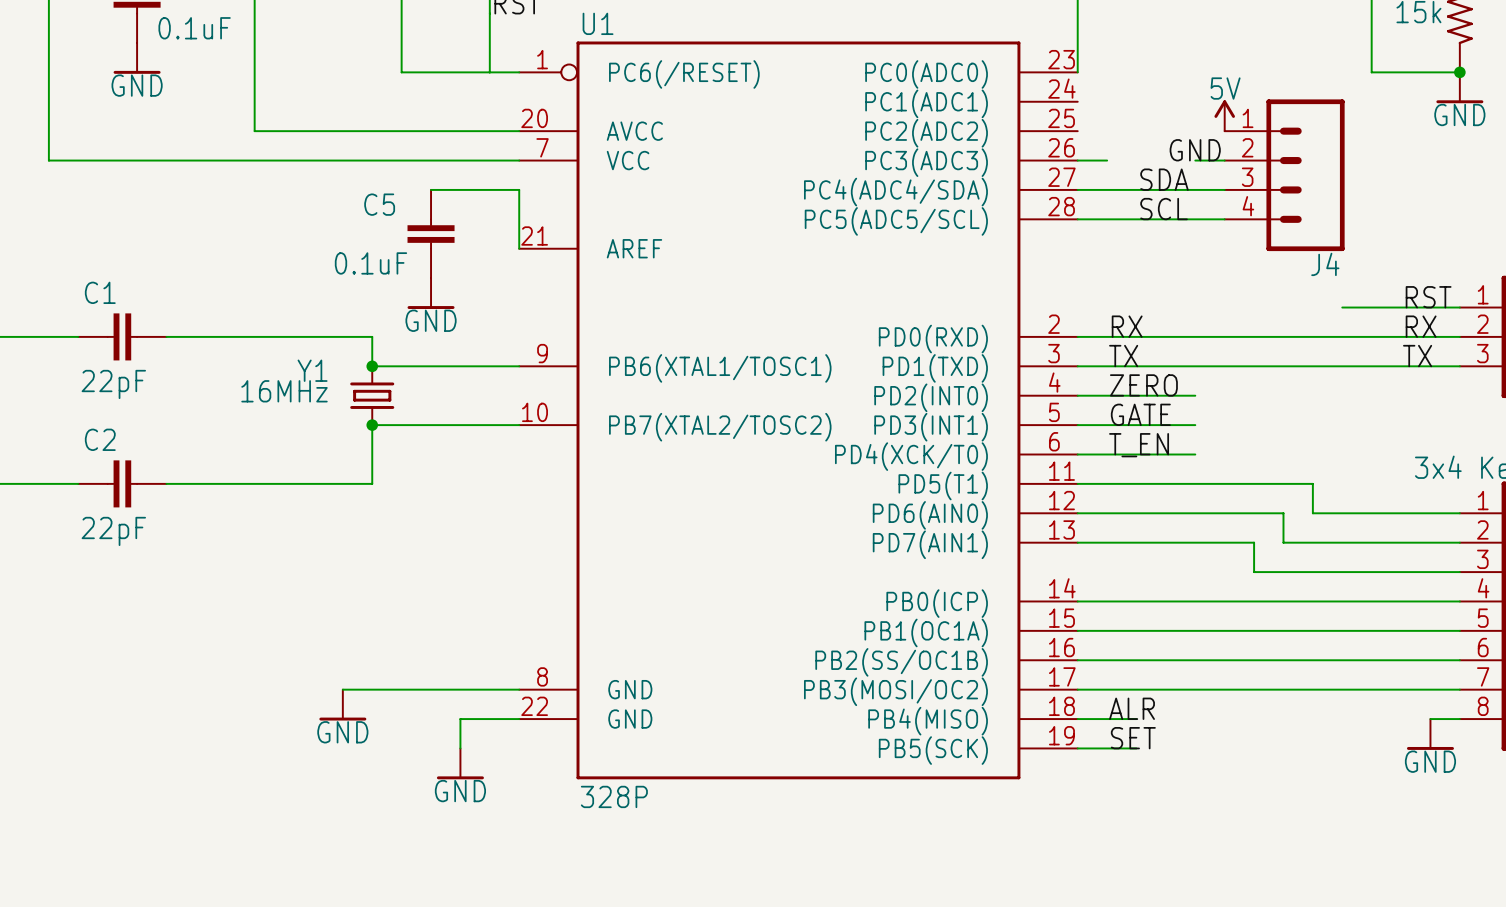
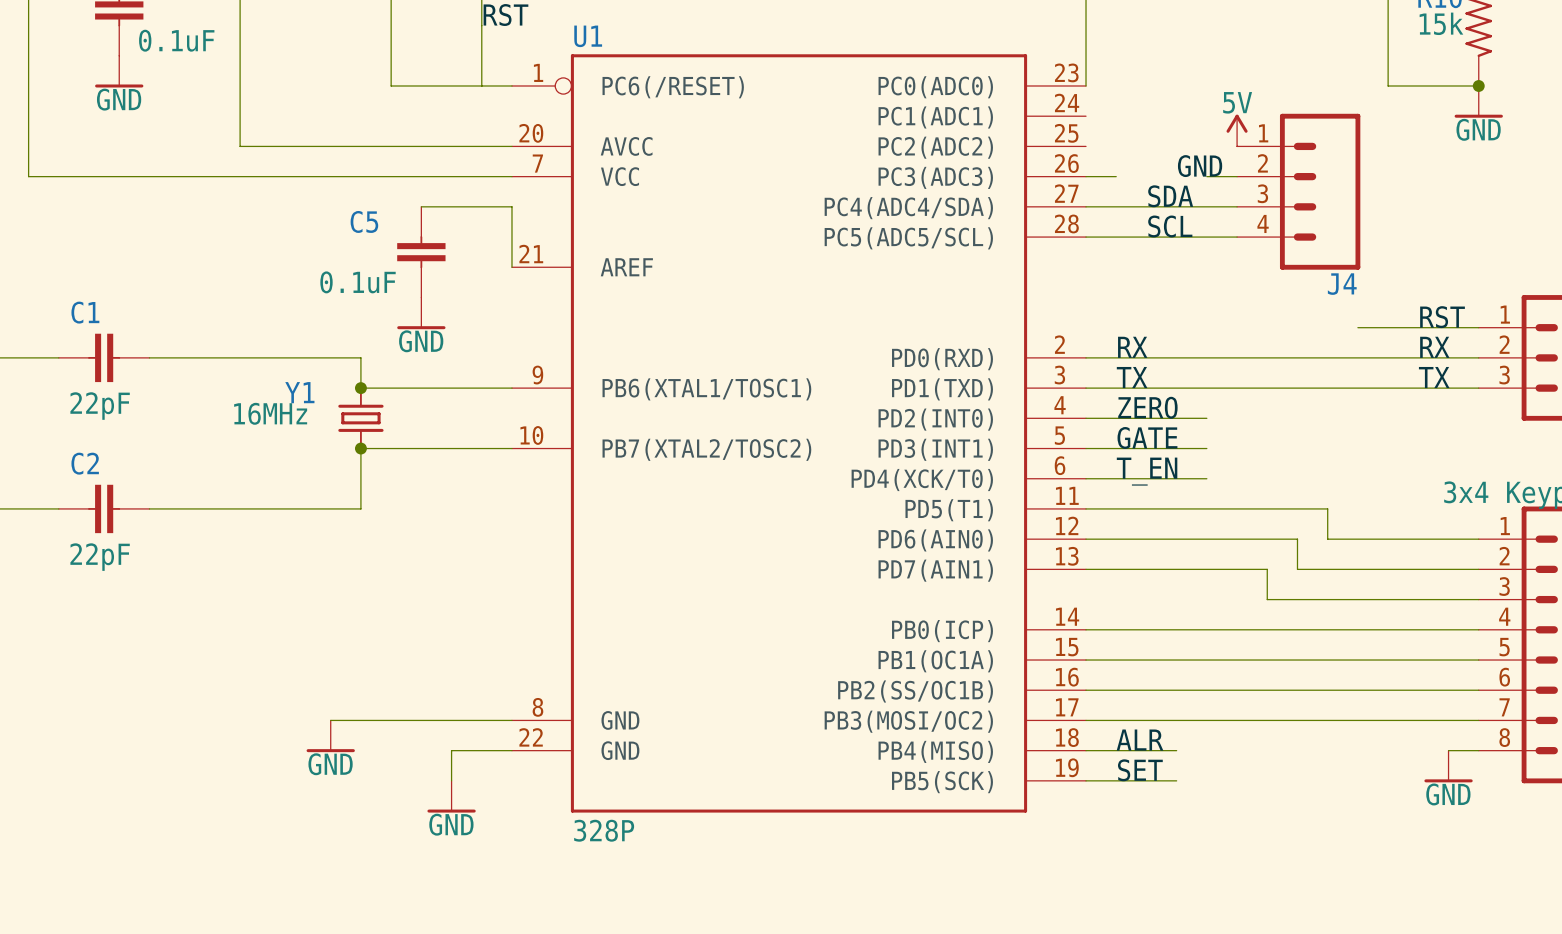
wire: none -> (1146, 750) (1176, 750)
wire: none -> (1146, 780) (1176, 780)

